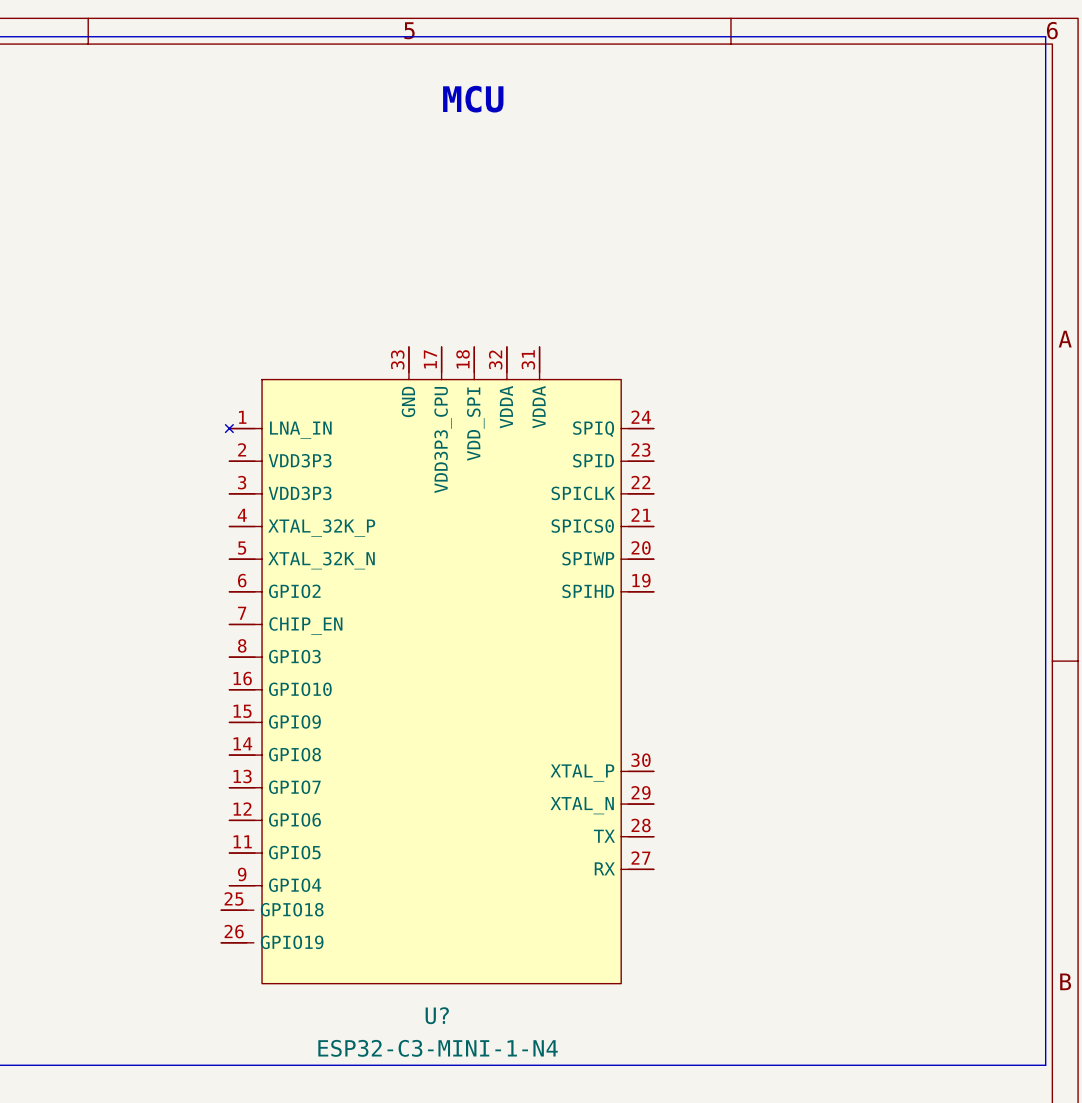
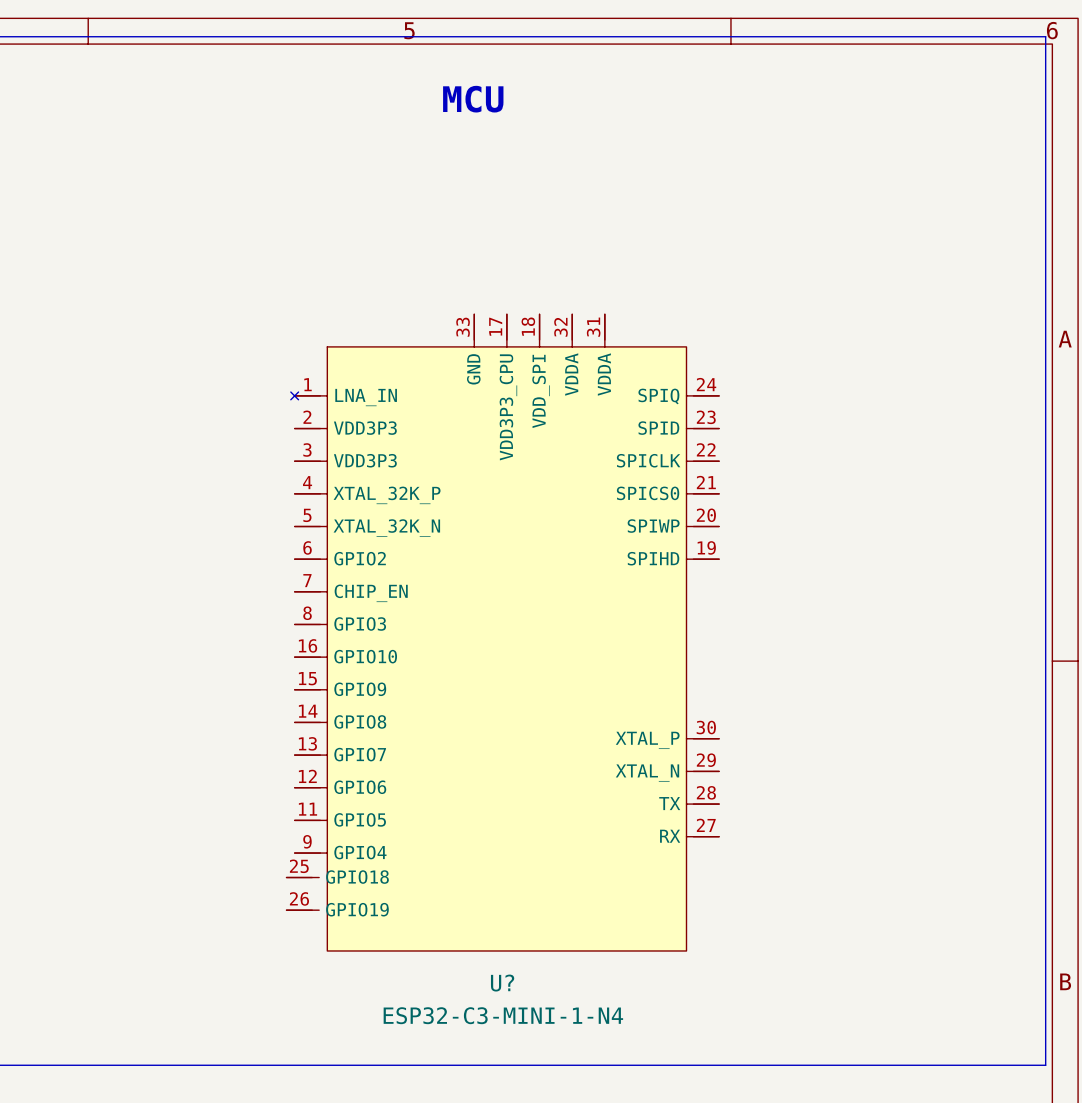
U? position: (437, 665) -> (502, 632)

